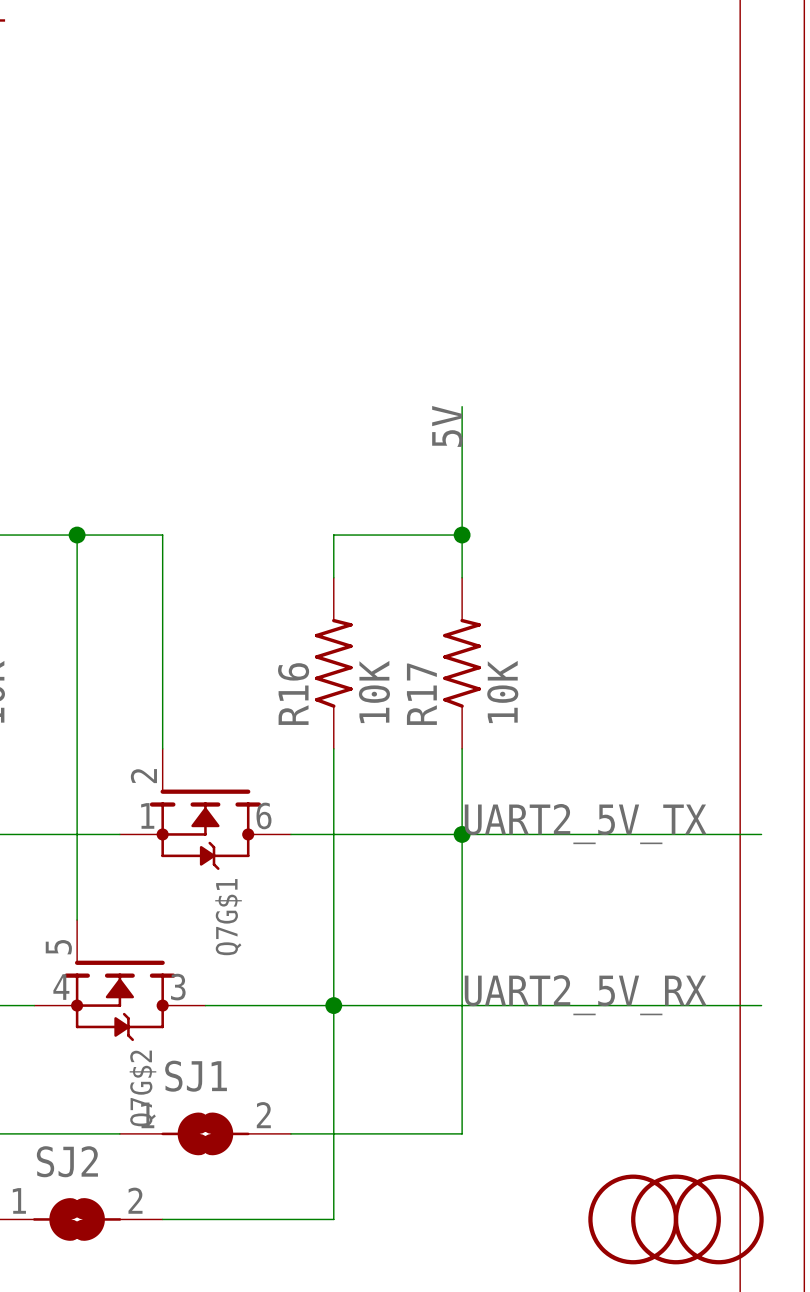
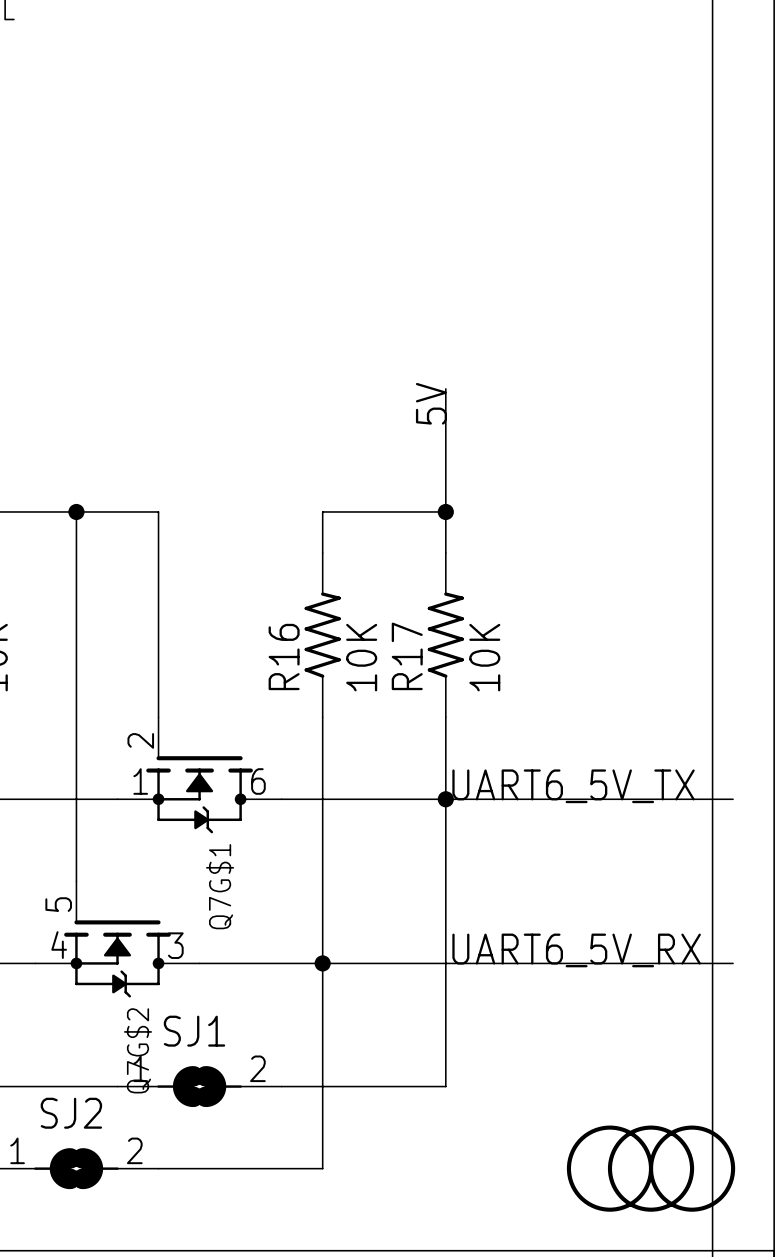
label: UART2_5V_TX (585, 824) -> UART6_5V_TX (573, 786)
label: UART2_5V_RX (585, 995) -> UART6_5V_RX (576, 950)

